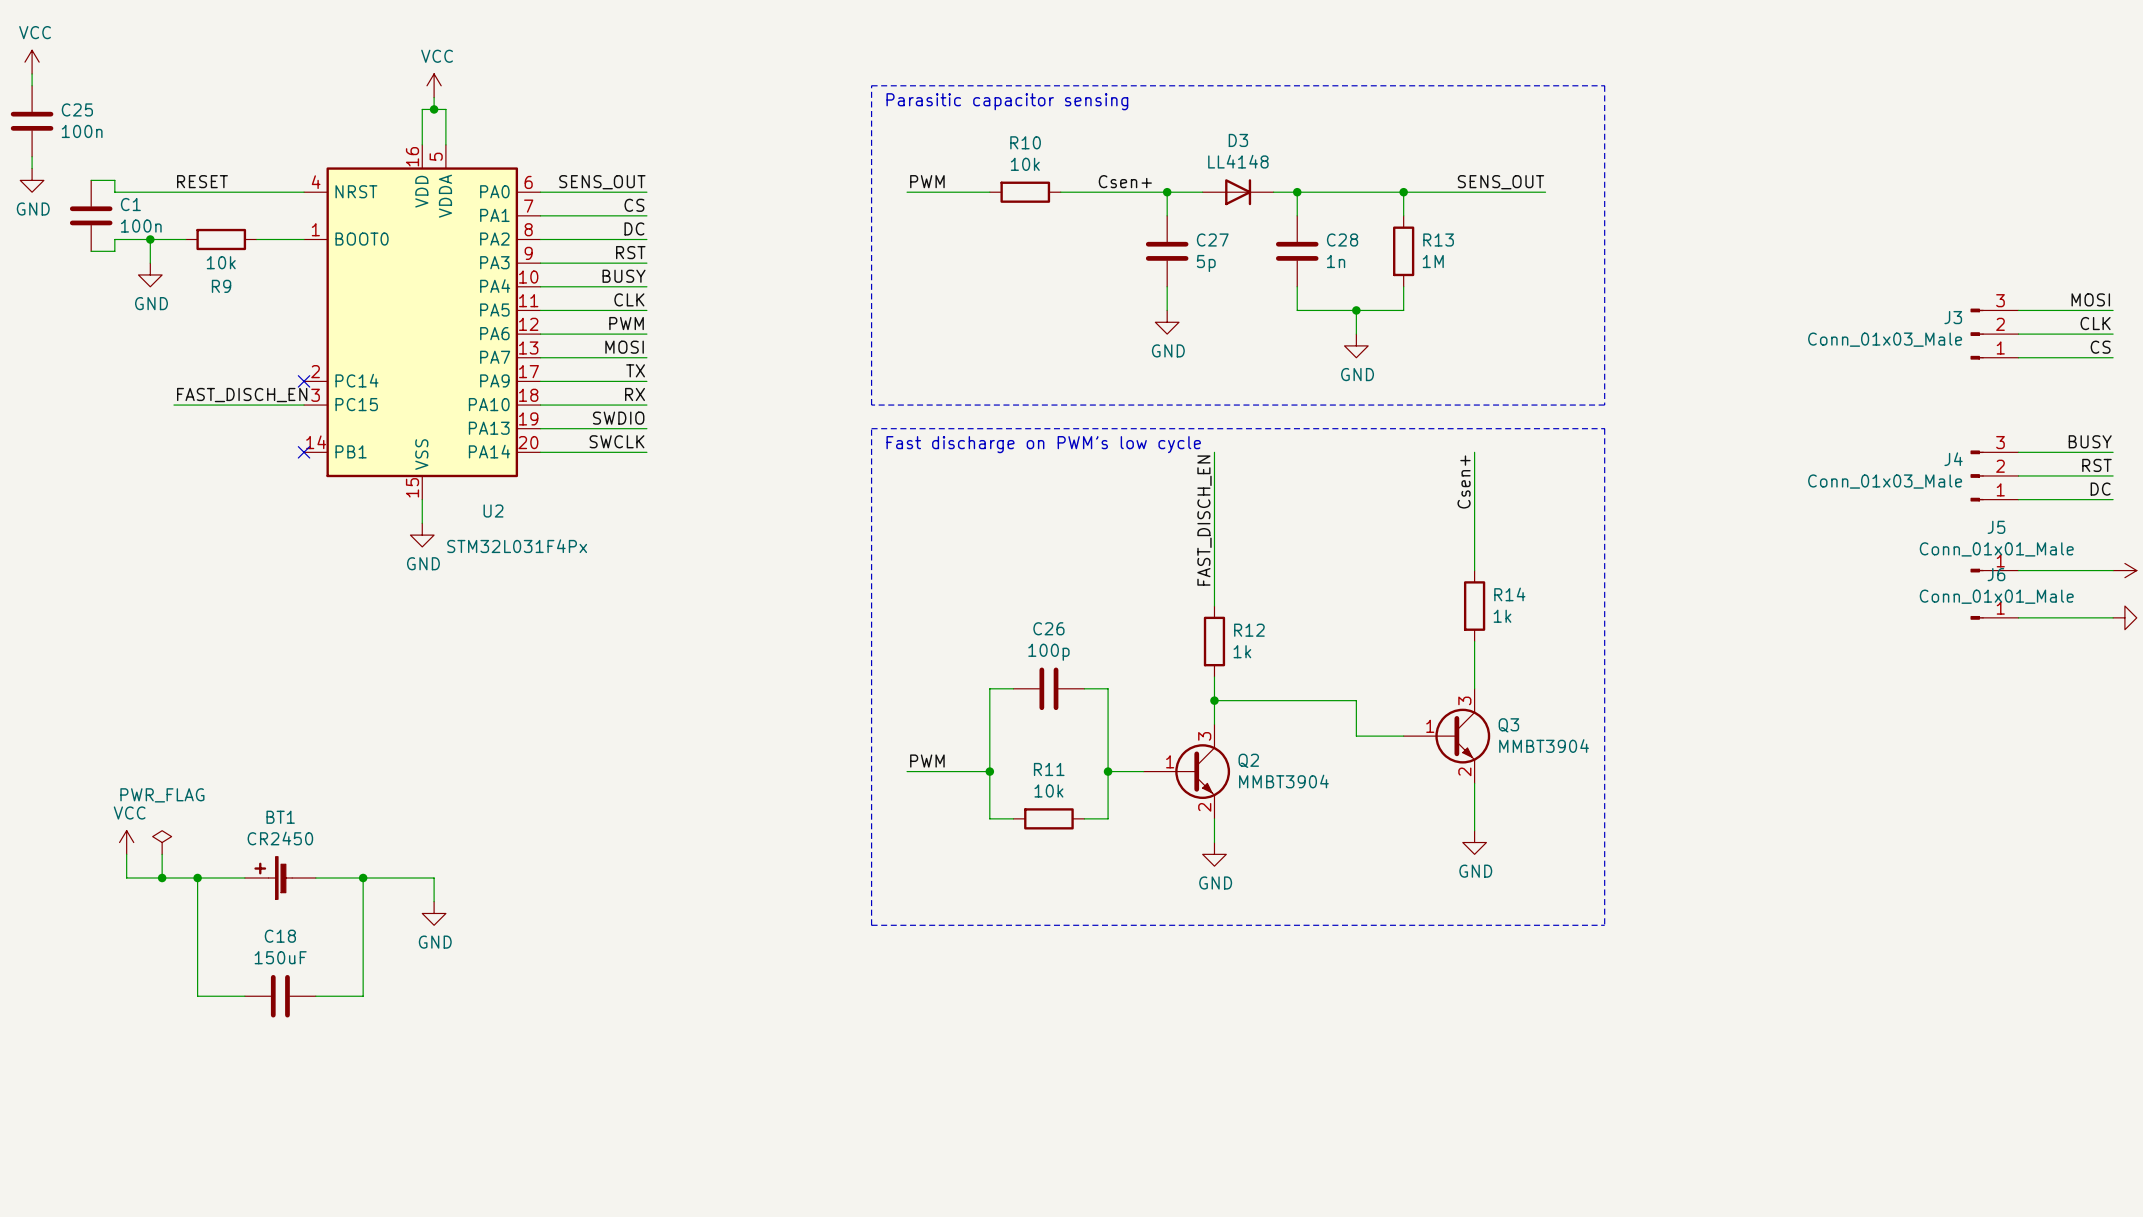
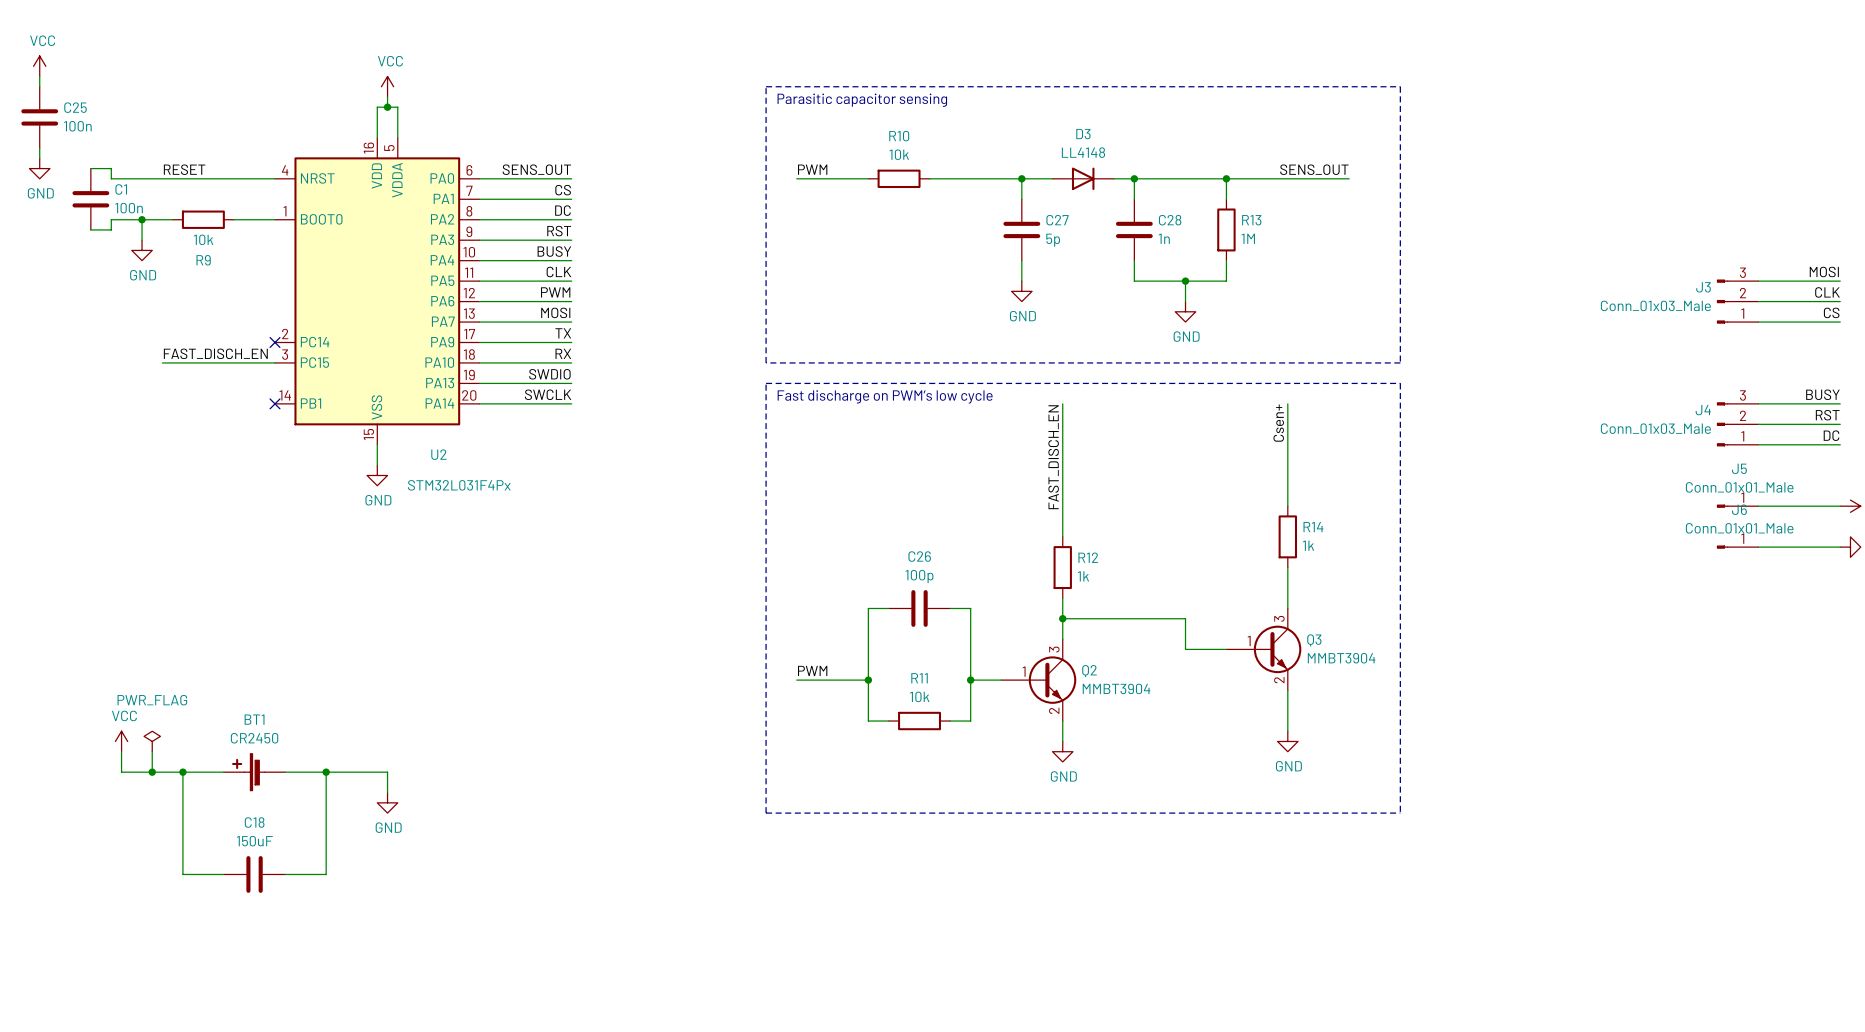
label: Csen+ (1125, 181) -> none

